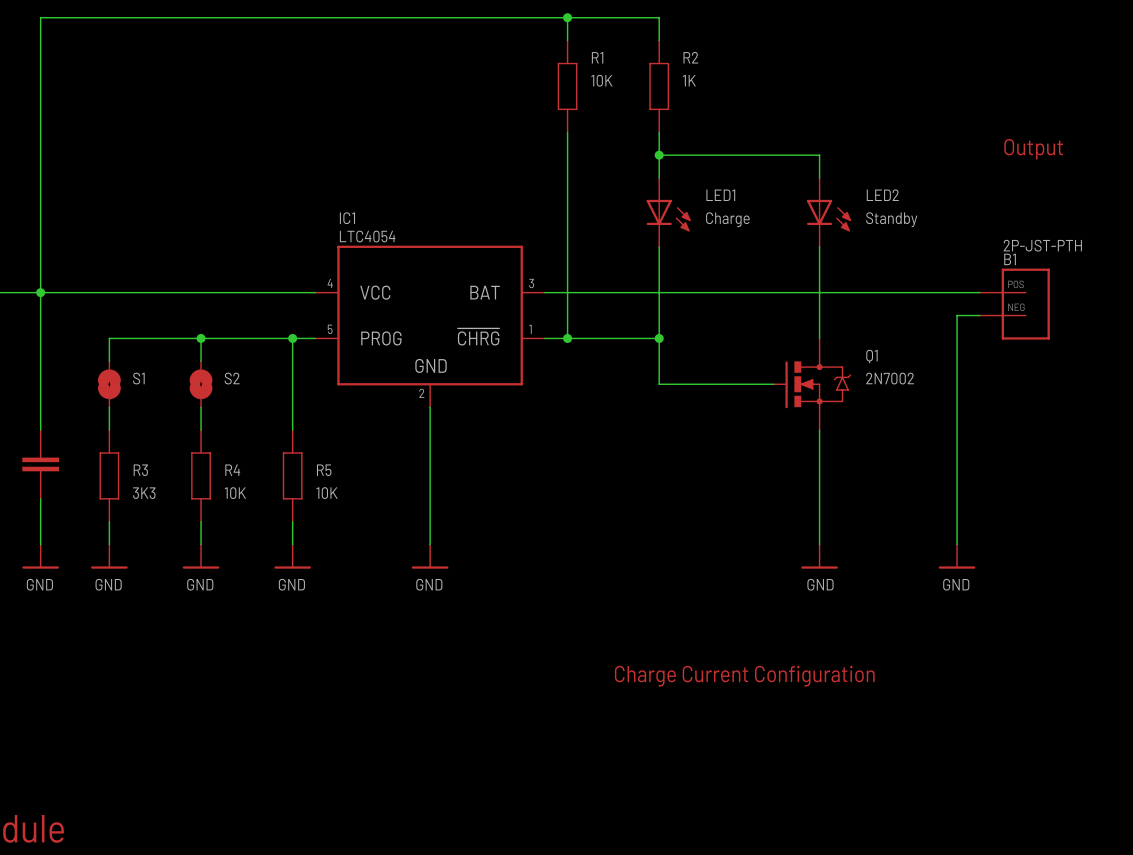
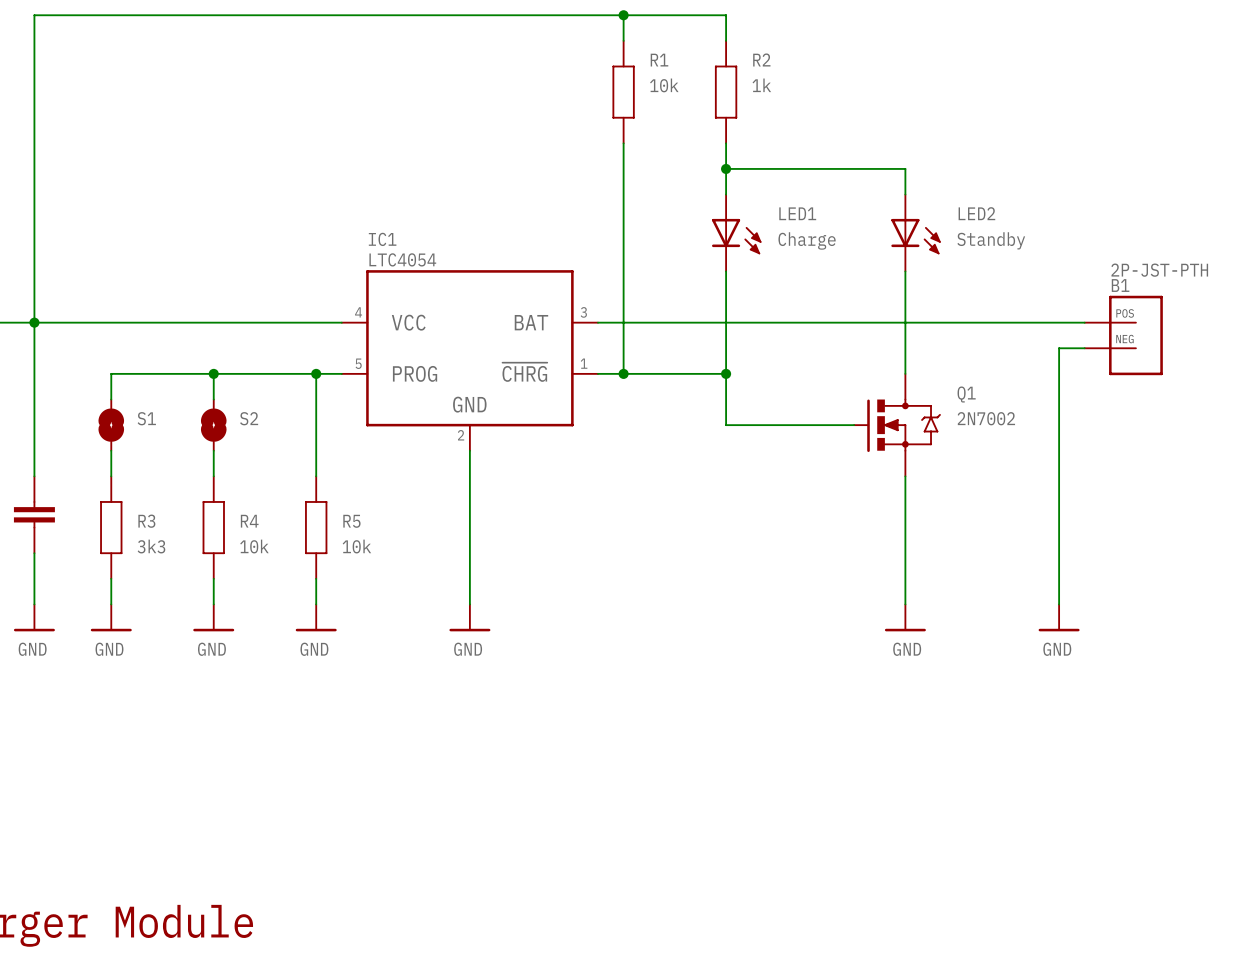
R1 value: 10K (601, 80) -> 10k (664, 85)
R2 value: 1K (689, 80) -> 1k (761, 85)
text: Output (1033, 149) -> none
R3 value: 3K3 (144, 493) -> 3k3 (151, 546)
R4 value: 10K (235, 493) -> 10k (254, 546)
R5 value: 10K (327, 493) -> 10k (356, 546)
text: Charge Current Configuration (744, 676) -> none

